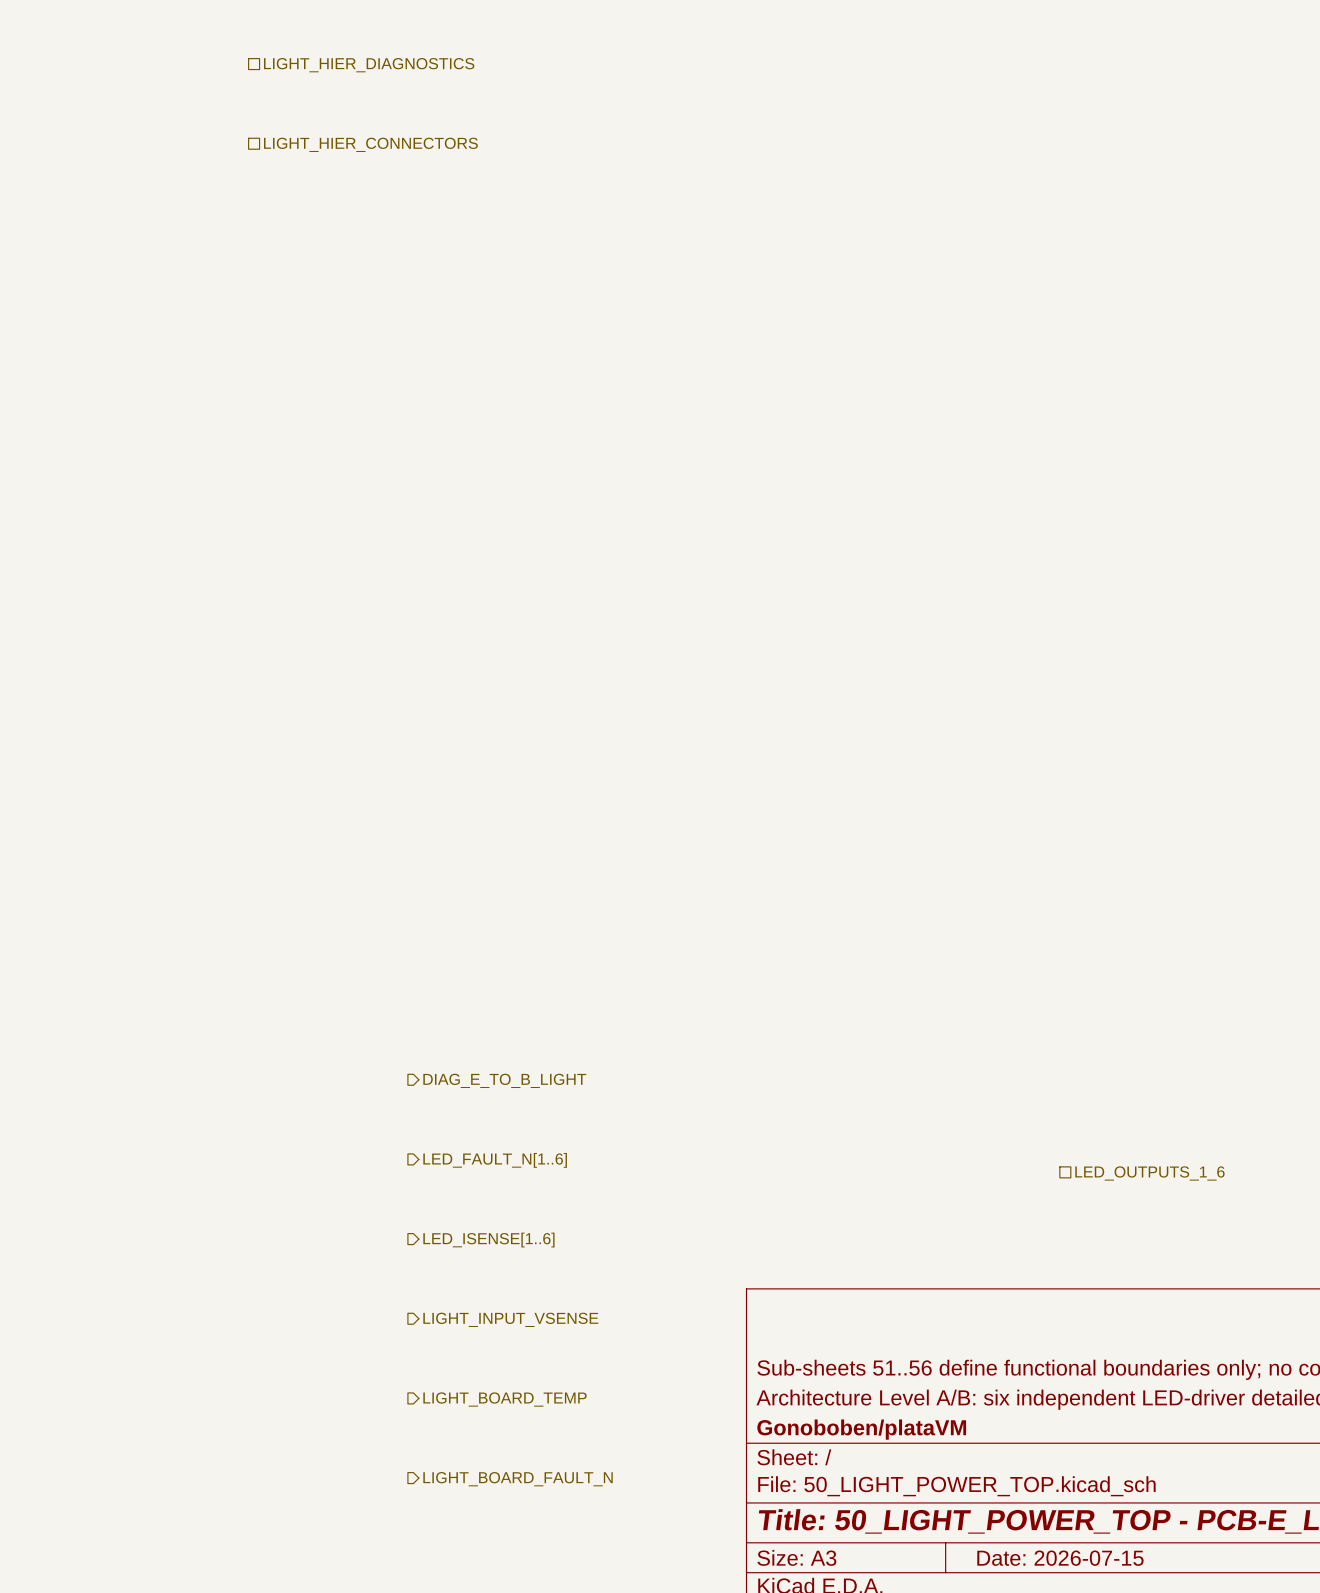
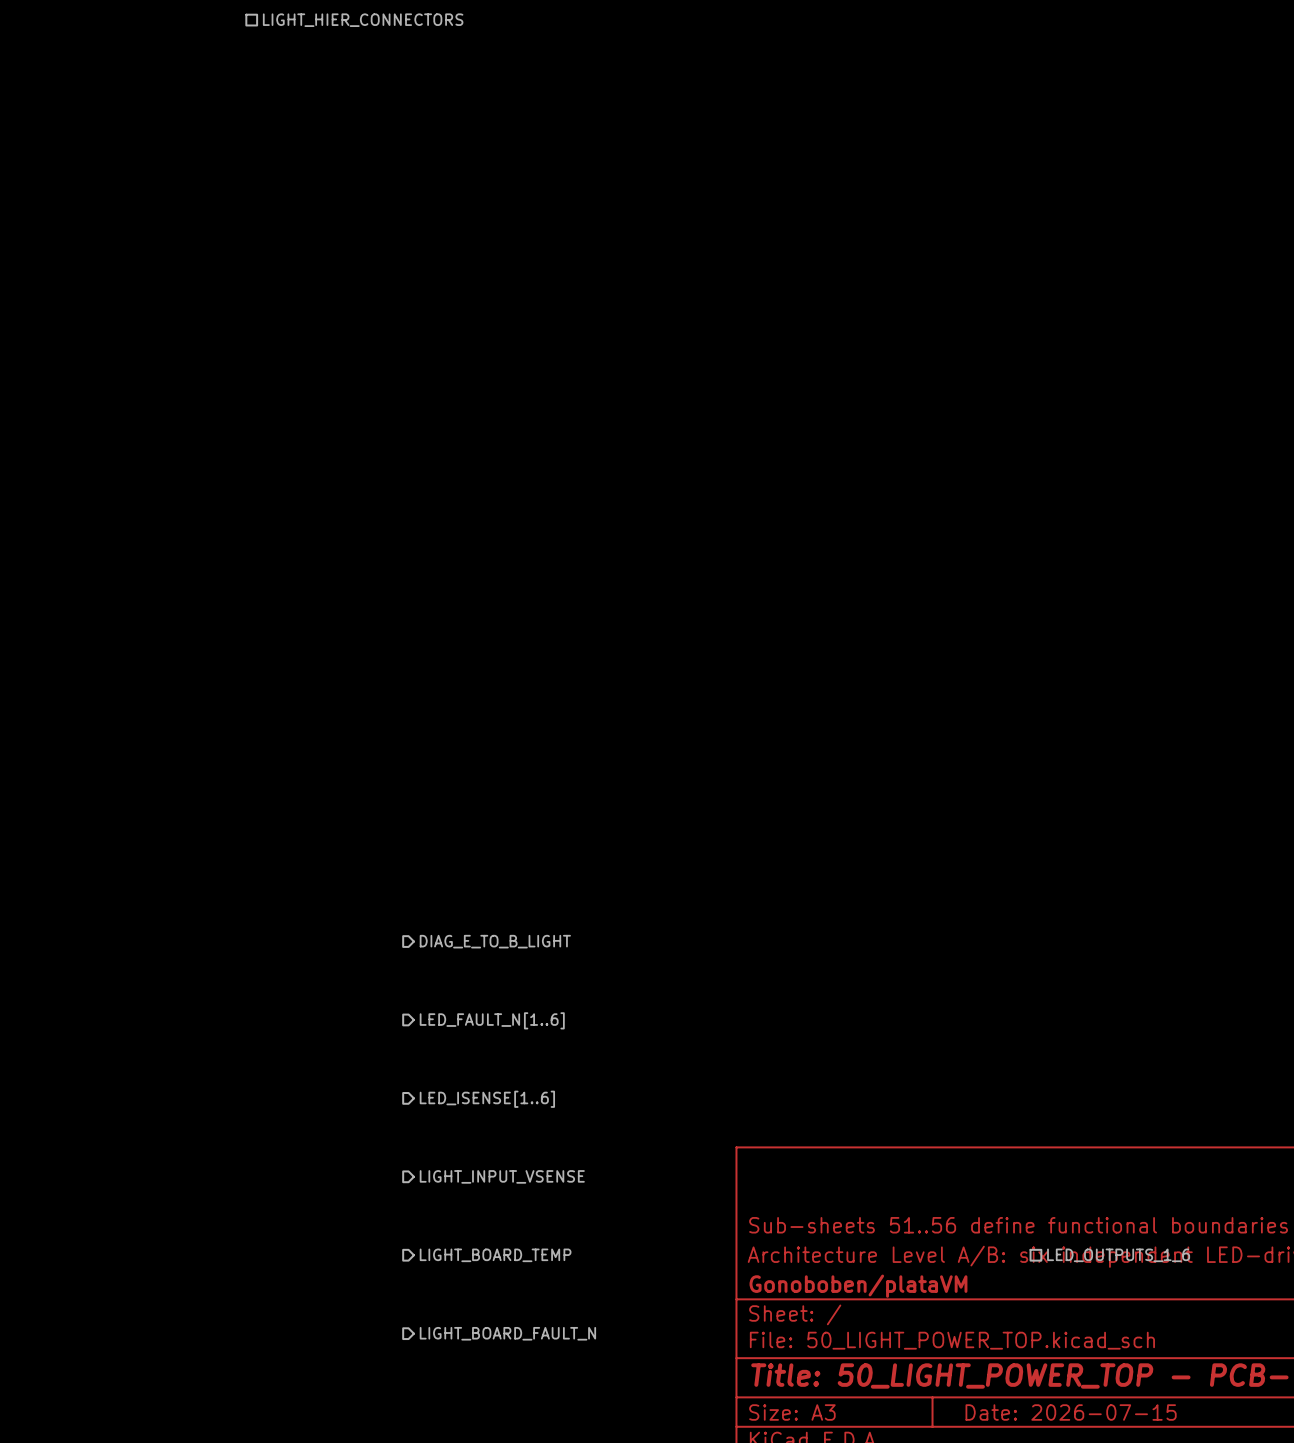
hierarchical label position: LED_OUTPUTS_1_6 (1149, 1173) -> LED_OUTPUTS_1_6 (1118, 1255)

